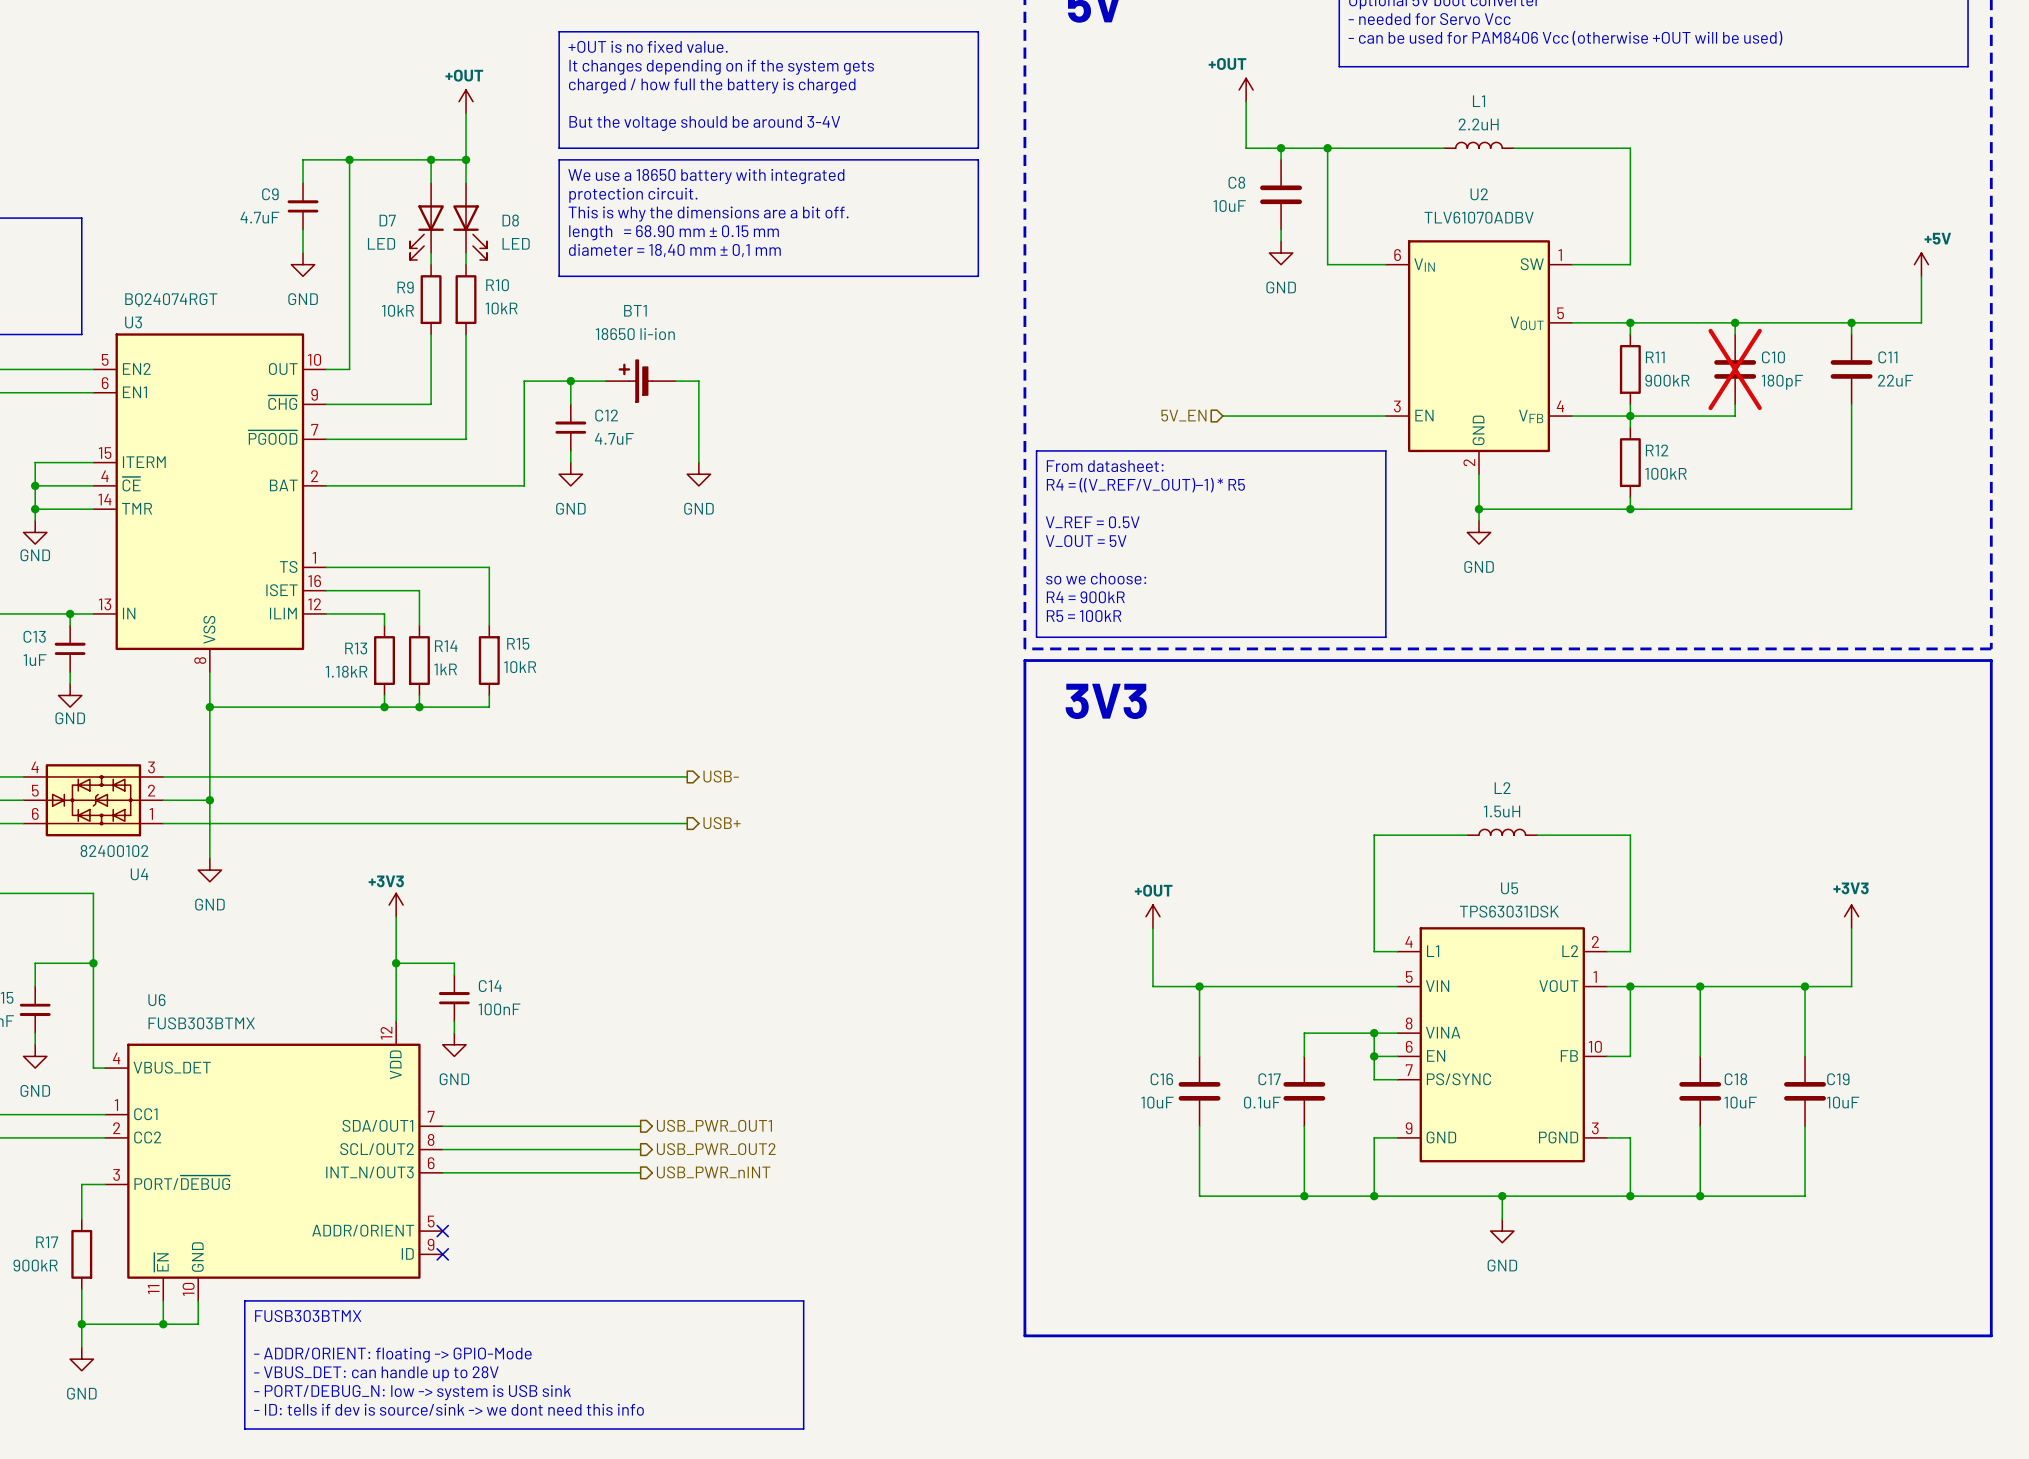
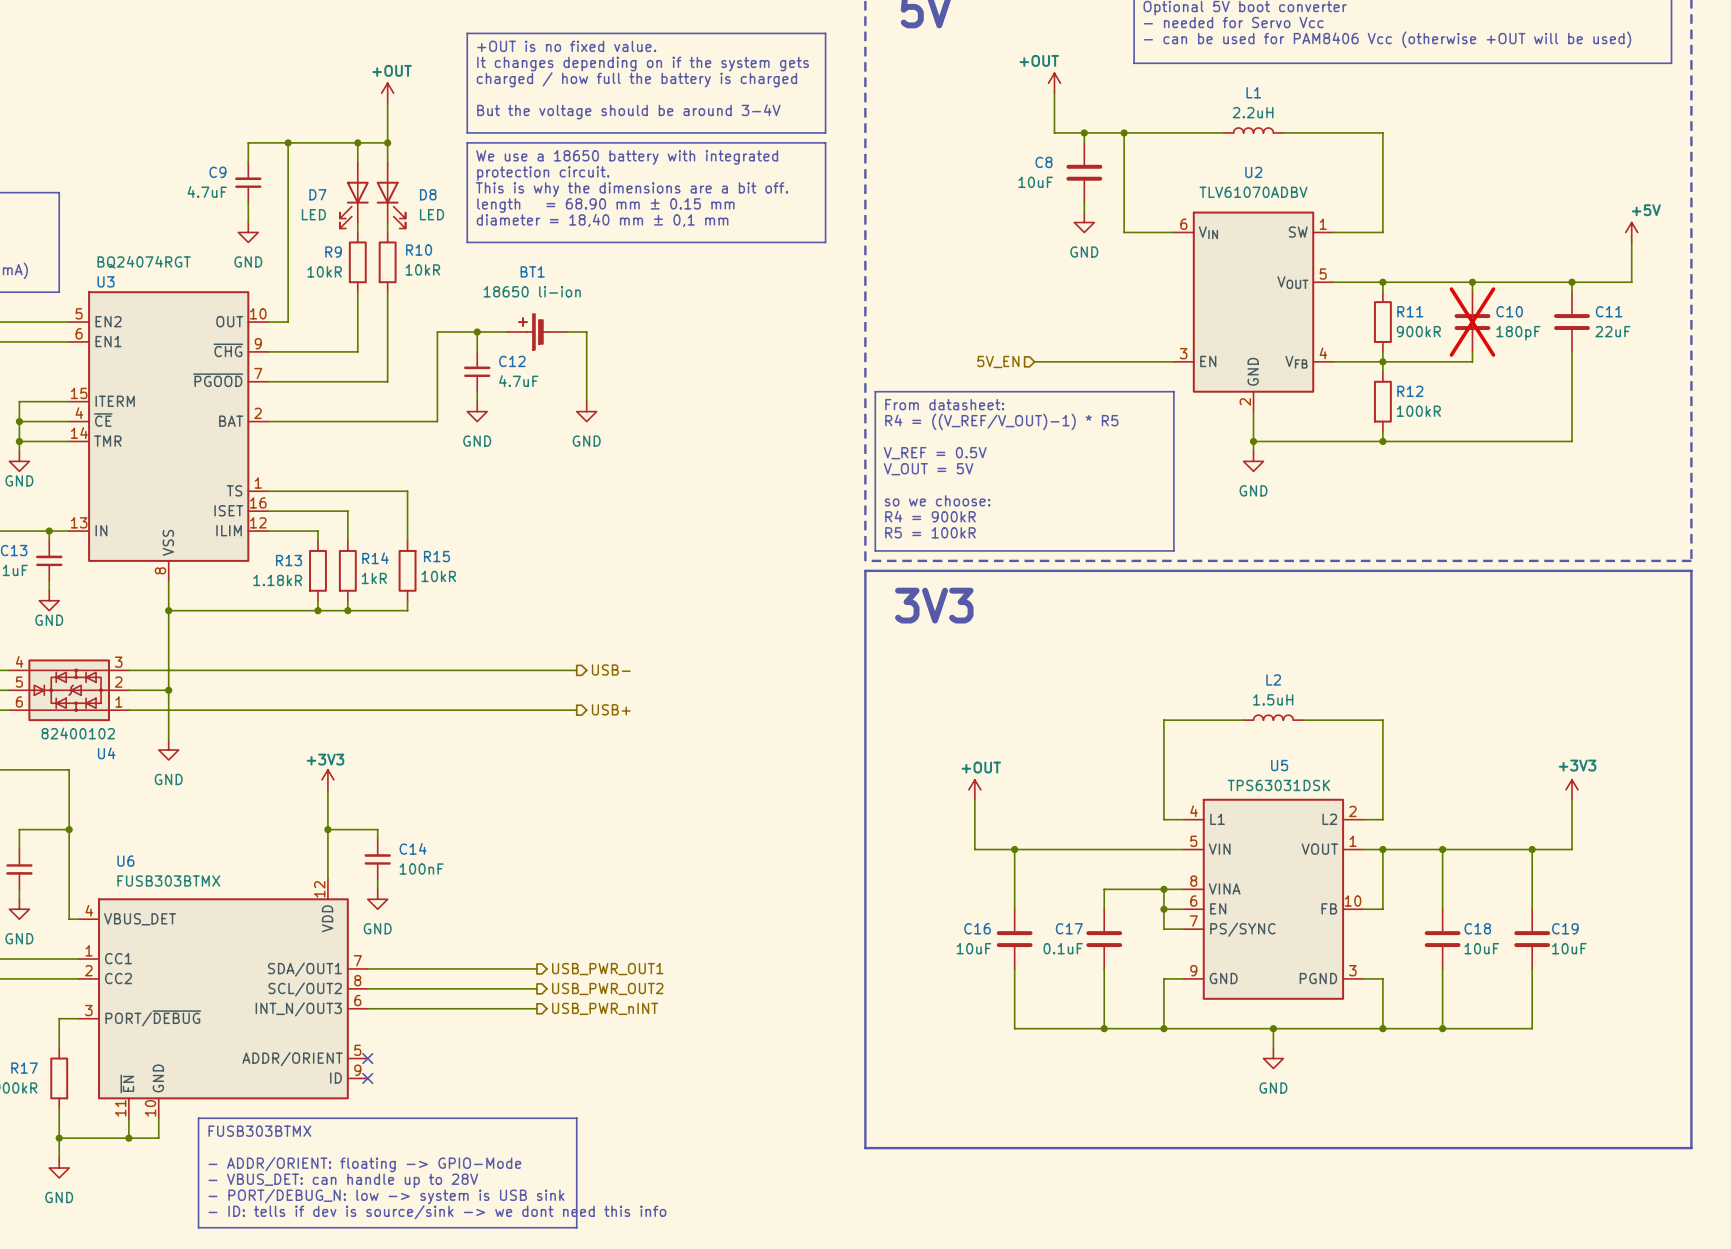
line: (687, 1300) (803, 1300) (803, 1429) (687, 1429) -> (576, 1118) (576, 1227)

